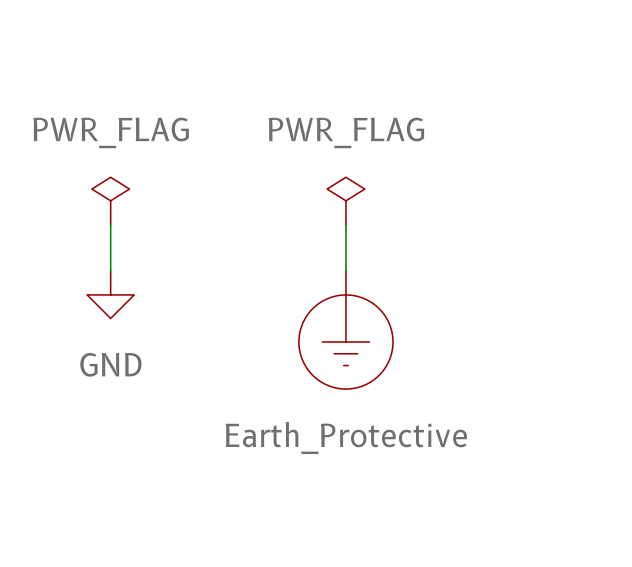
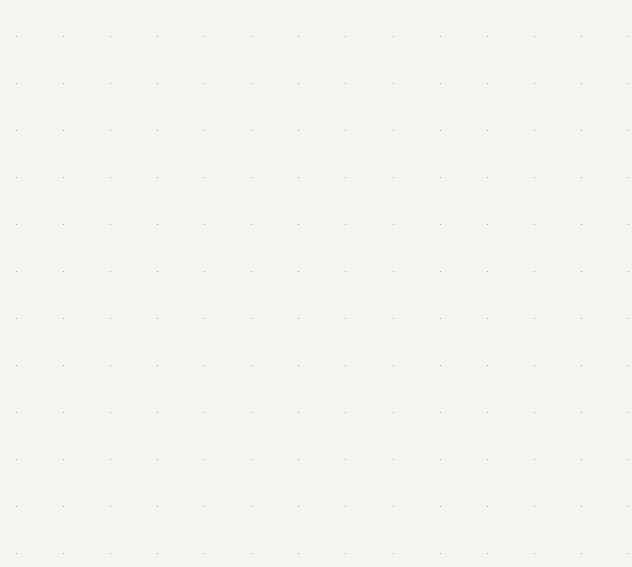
power symbol: PWR_FLAG (110, 200) -> none
power symbol: PWR_FLAG (345, 200) -> none
wire: (110, 224) (110, 271) -> none
wire: (345, 224) (345, 271) -> none
power symbol: GND (110, 294) -> none
power symbol: Earth_Protective (345, 330) -> none

